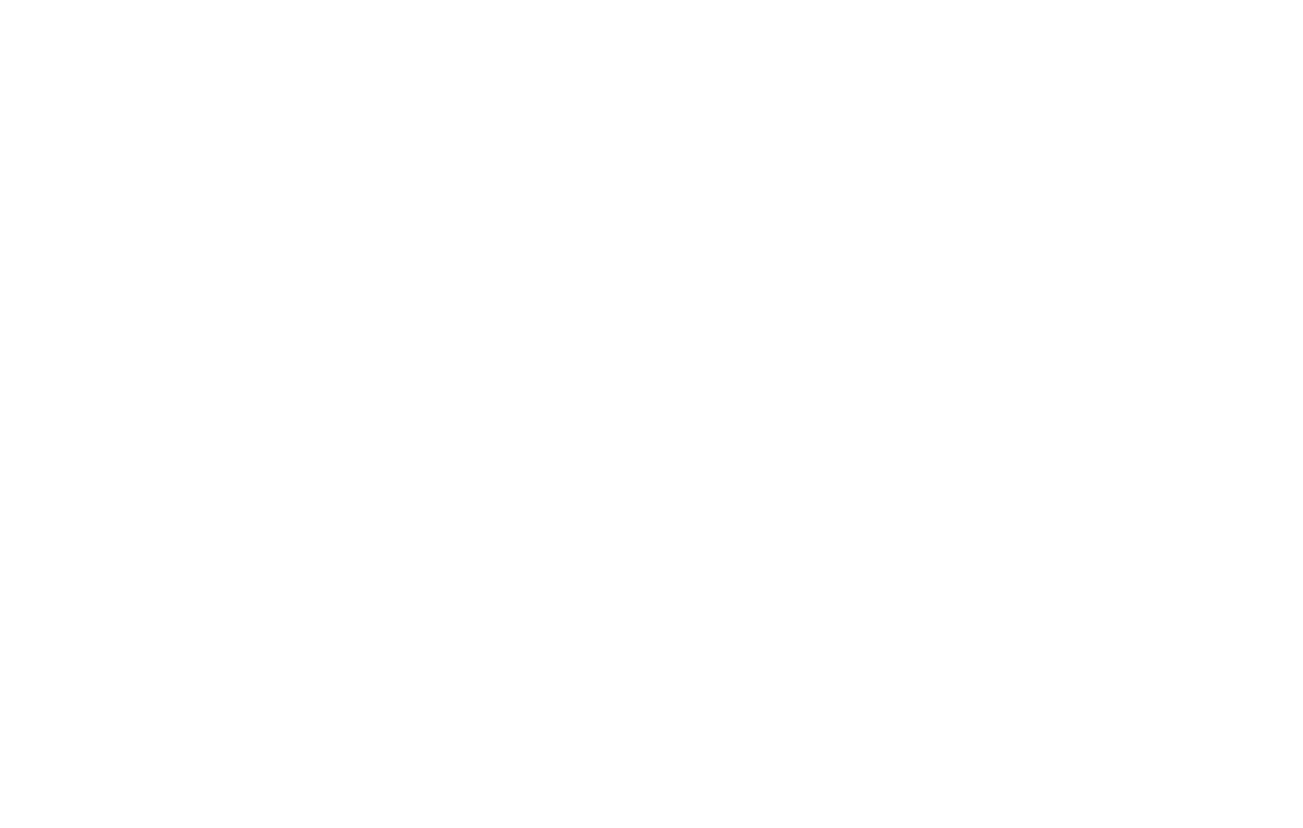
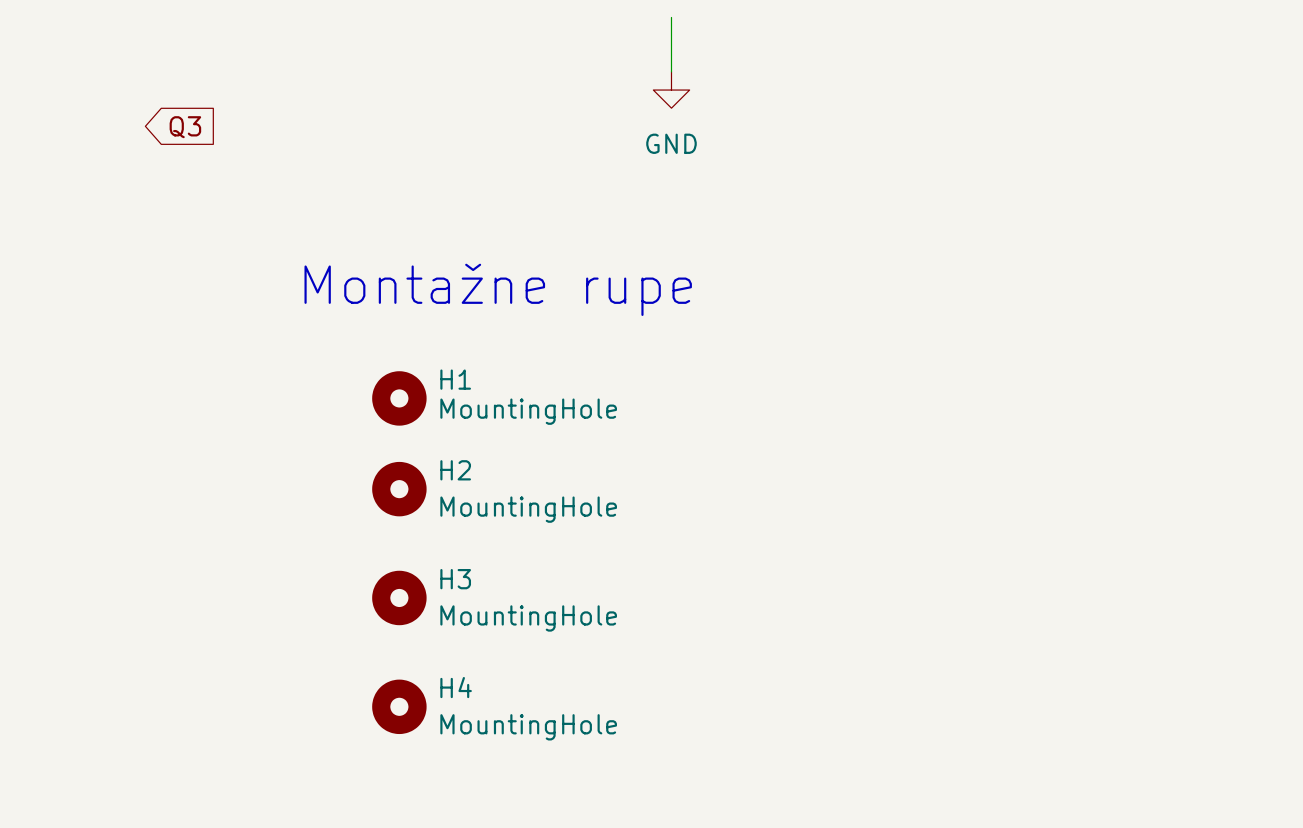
wire: none -> (671, 17) (671, 71)
power symbol: none -> GND (671, 90)
global label: none -> Q3 (185, 127)
text: none -> Montažne rupe (498, 289)
H1: none -> MountingHole (399, 398)
H2: none -> MountingHole (399, 489)
H3: none -> MountingHole (399, 597)
H4: none -> MountingHole (399, 706)

